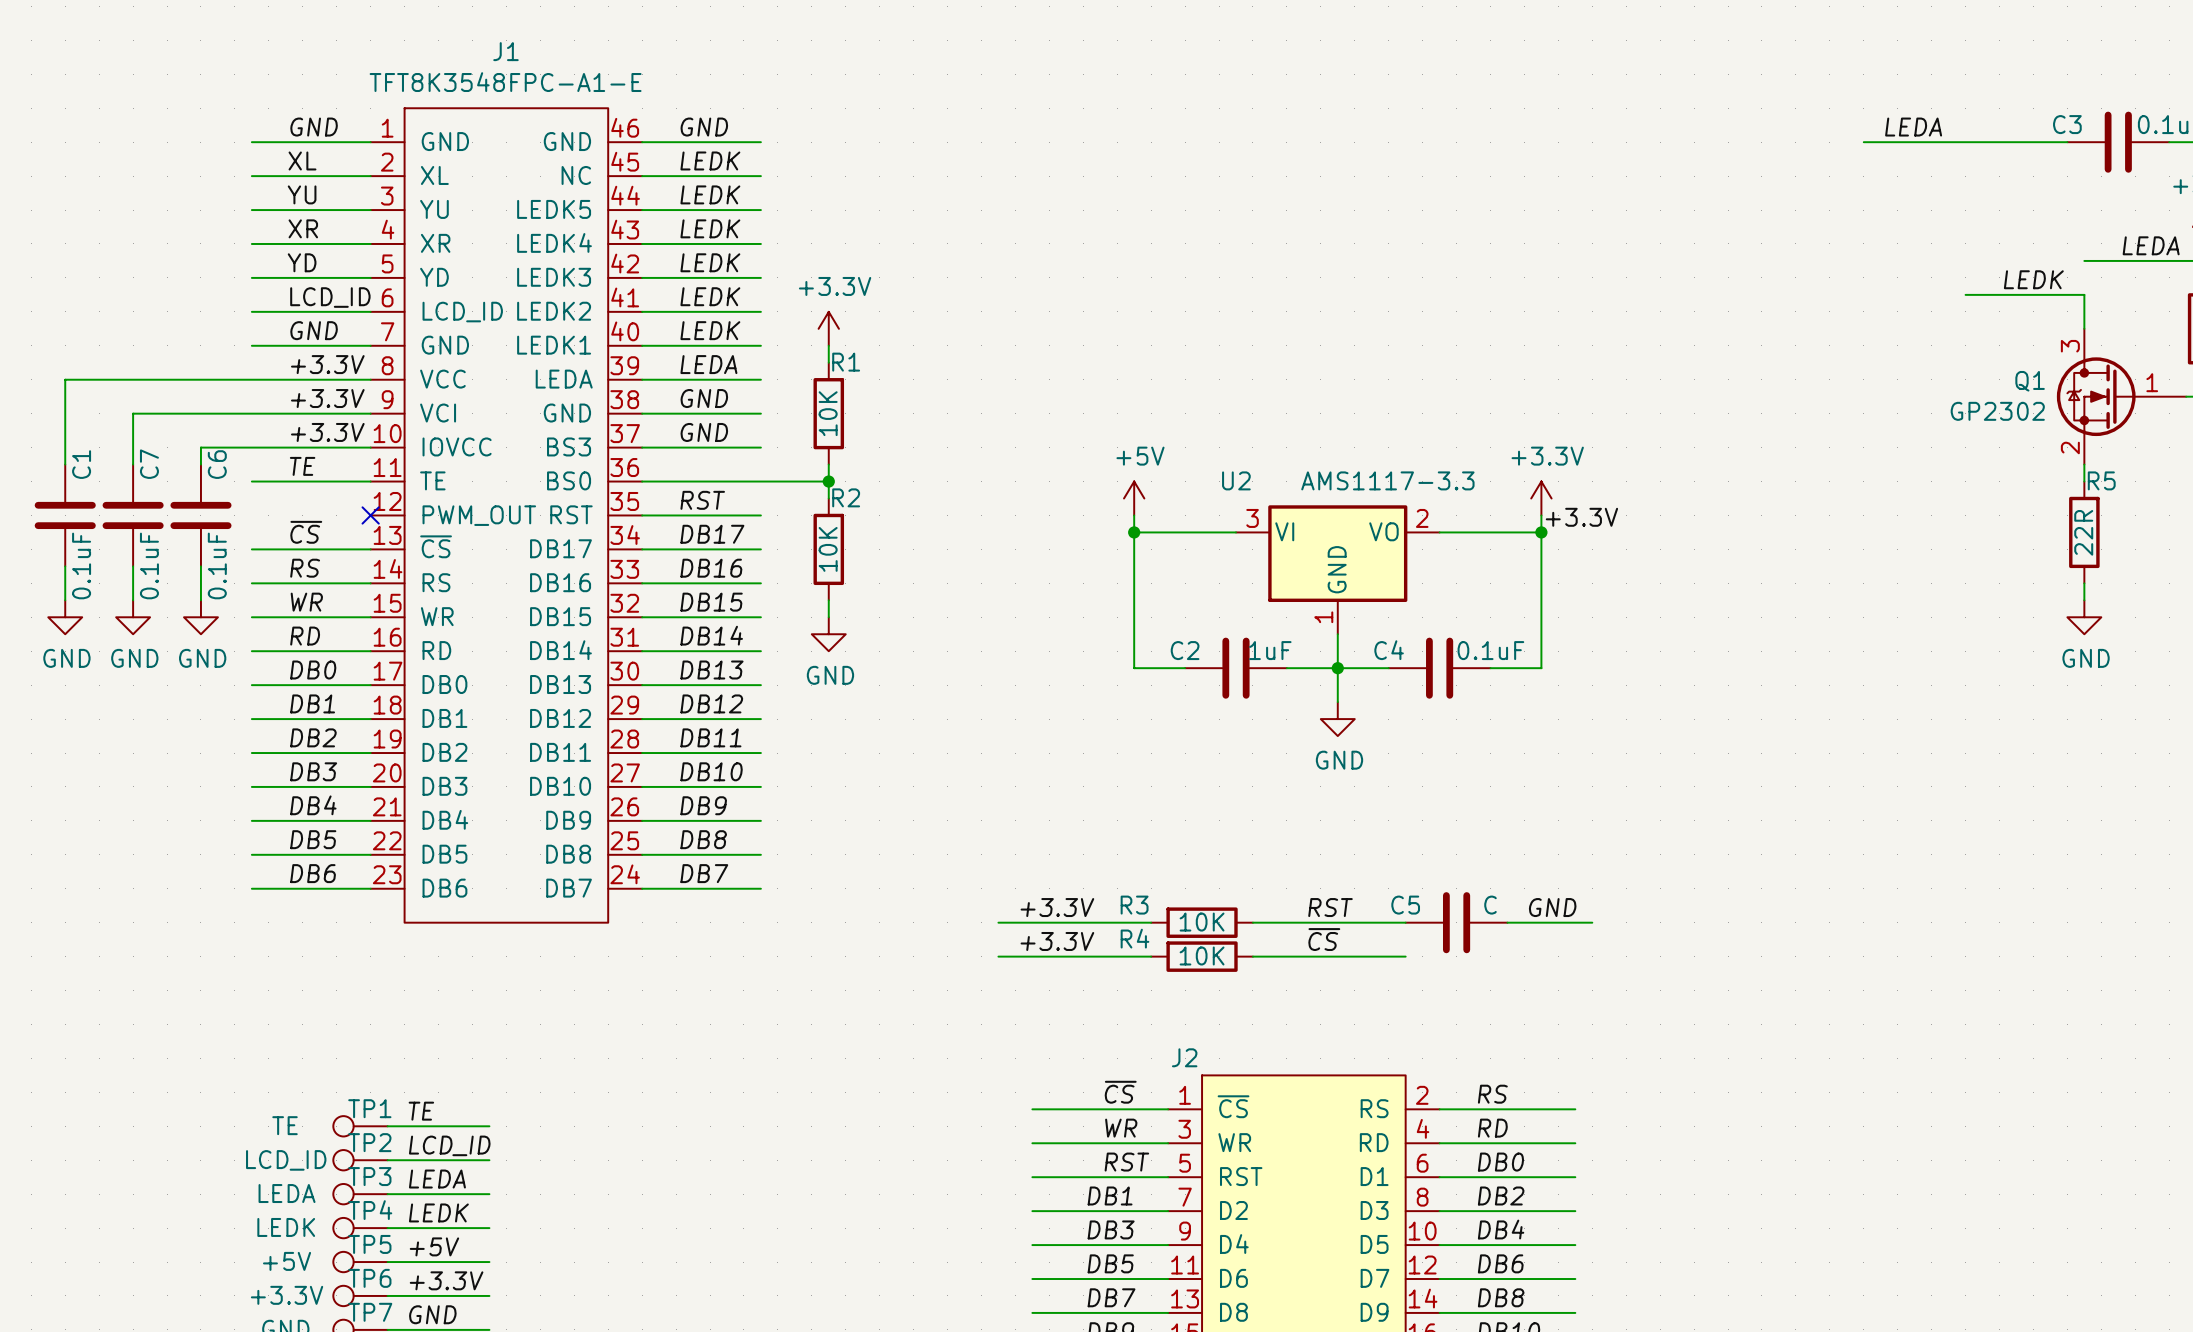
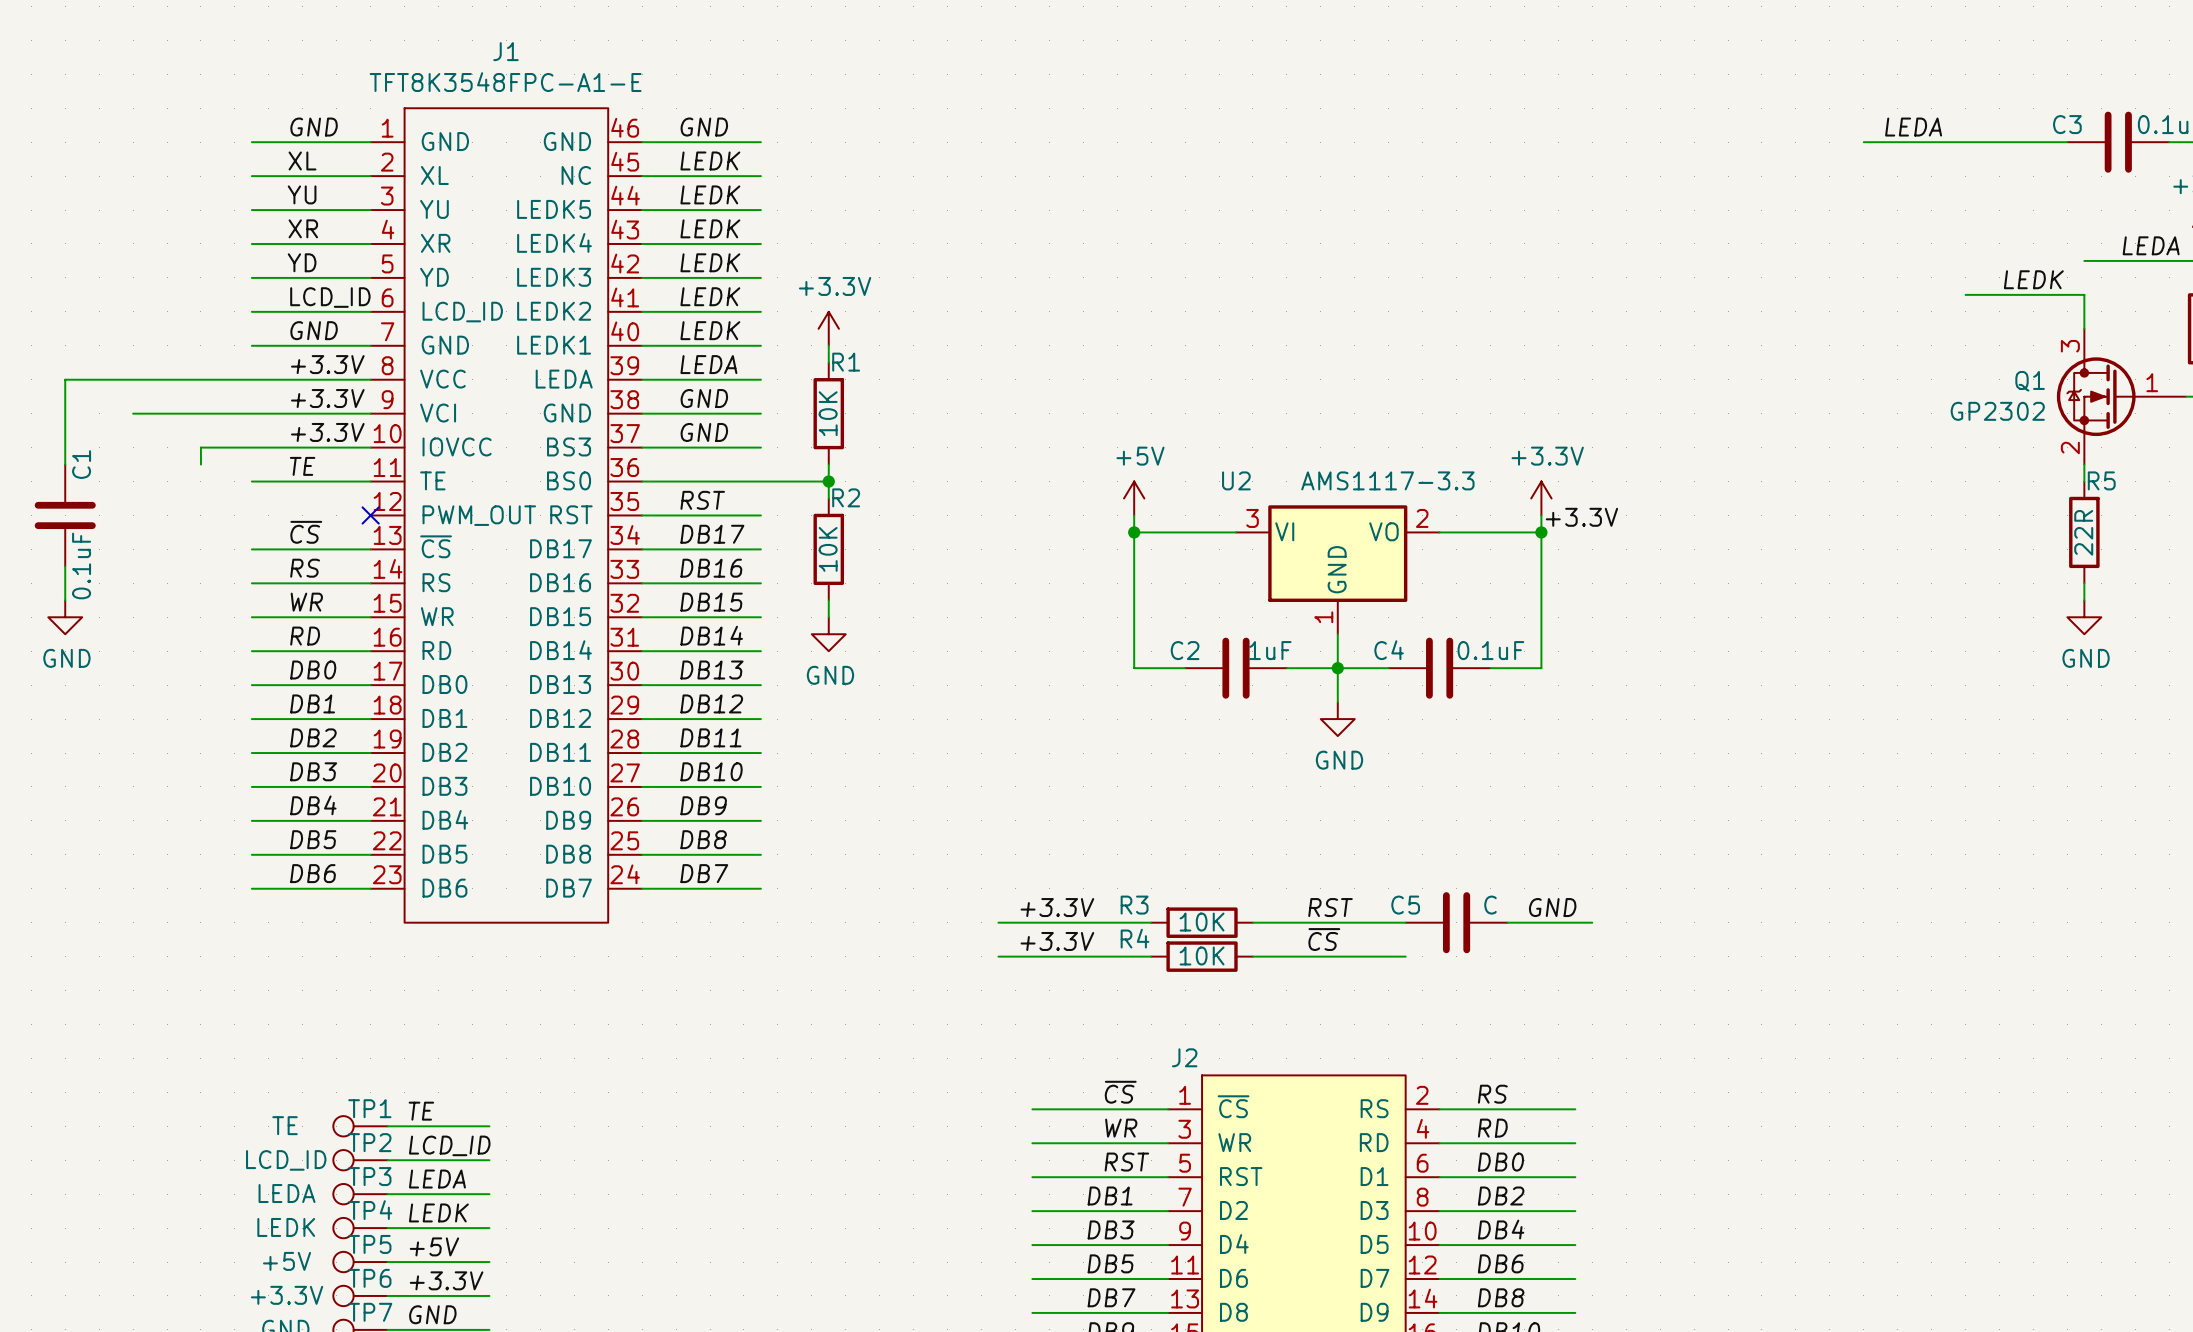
wire: (133, 413) (133, 464) -> none
C7: 0.1uF (133, 515) -> none
C6: 0.1uF (200, 515) -> none
wire: (133, 566) (133, 600) -> none
wire: (200, 566) (200, 600) -> none
power symbol: GND (133, 617) -> none
power symbol: GND (200, 617) -> none

